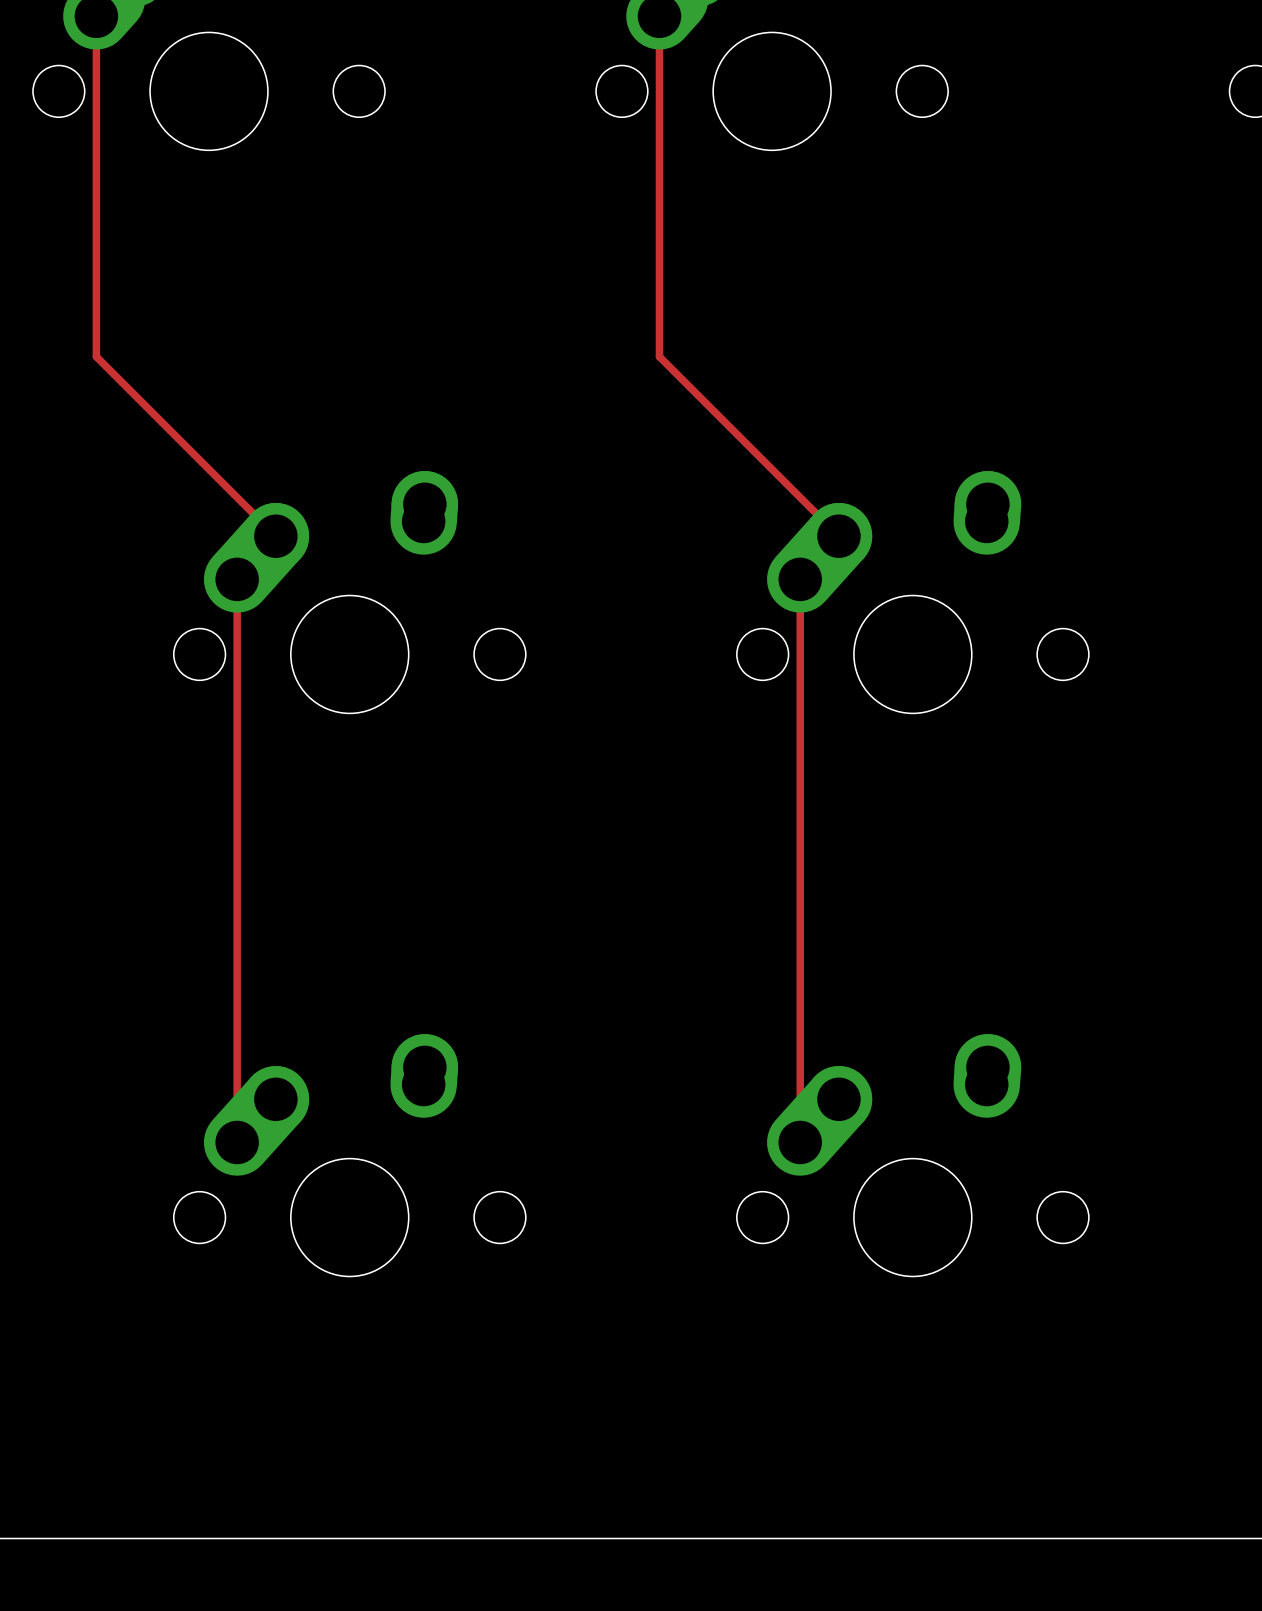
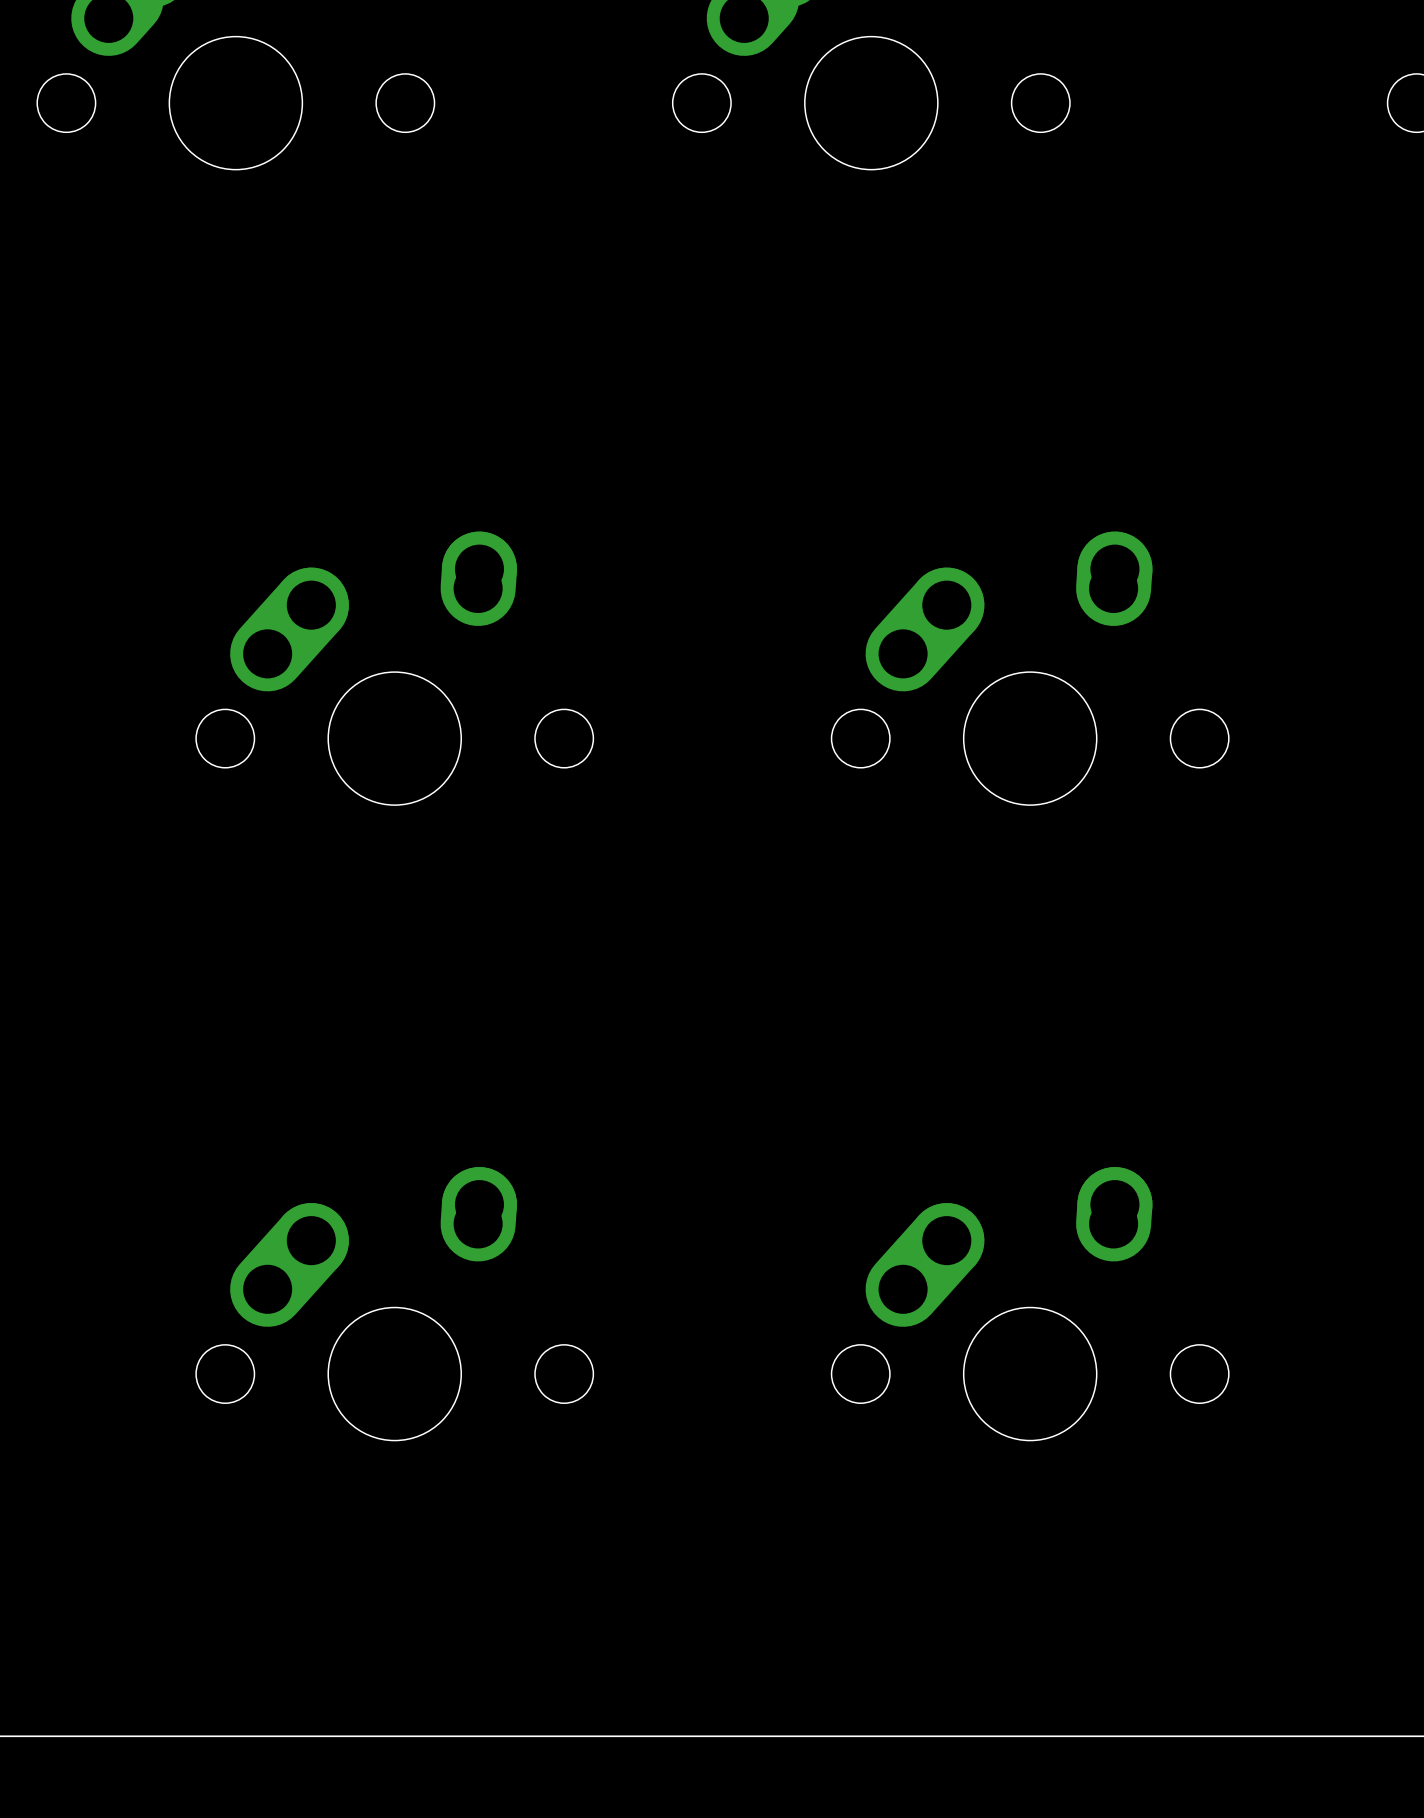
track: (96, 16) (96, 356) (275, 536) -> none
track: (659, 16) (659, 356) (838, 536) -> none
track: (237, 579) (237, 1142) -> none
track: (800, 579) (800, 1142) -> none

